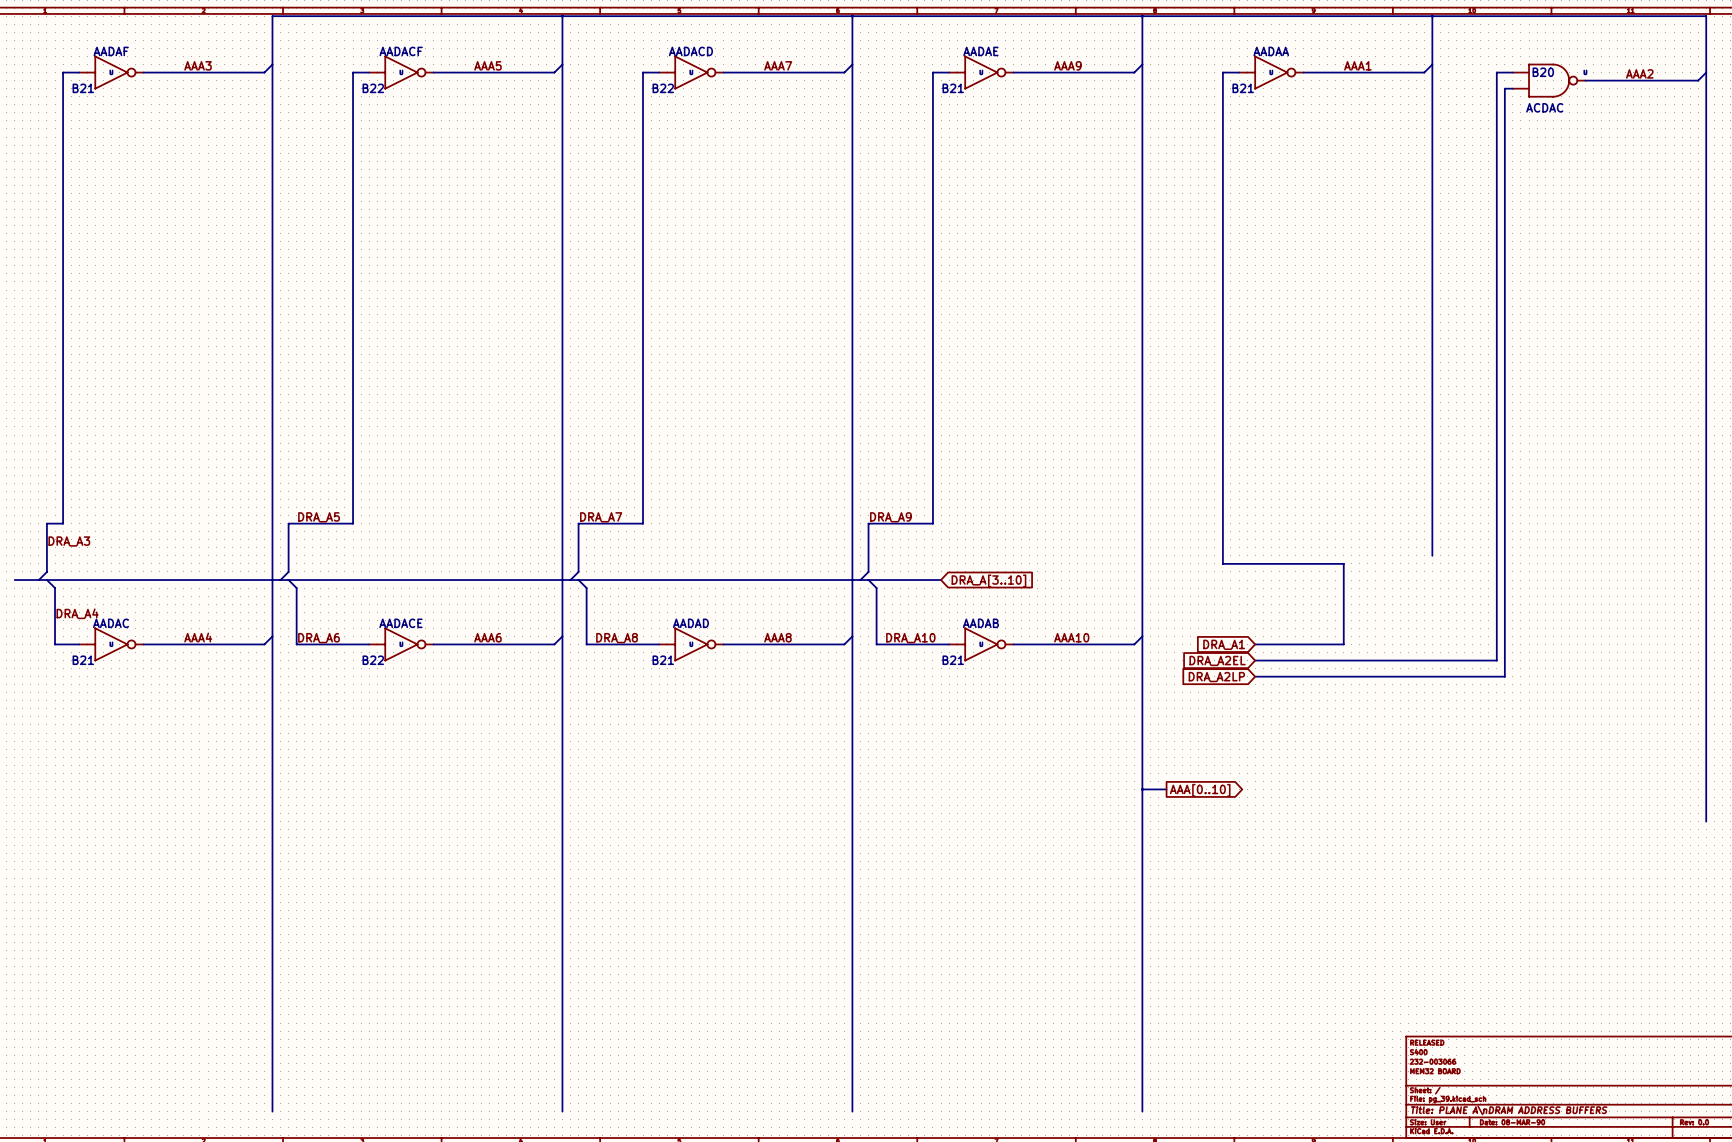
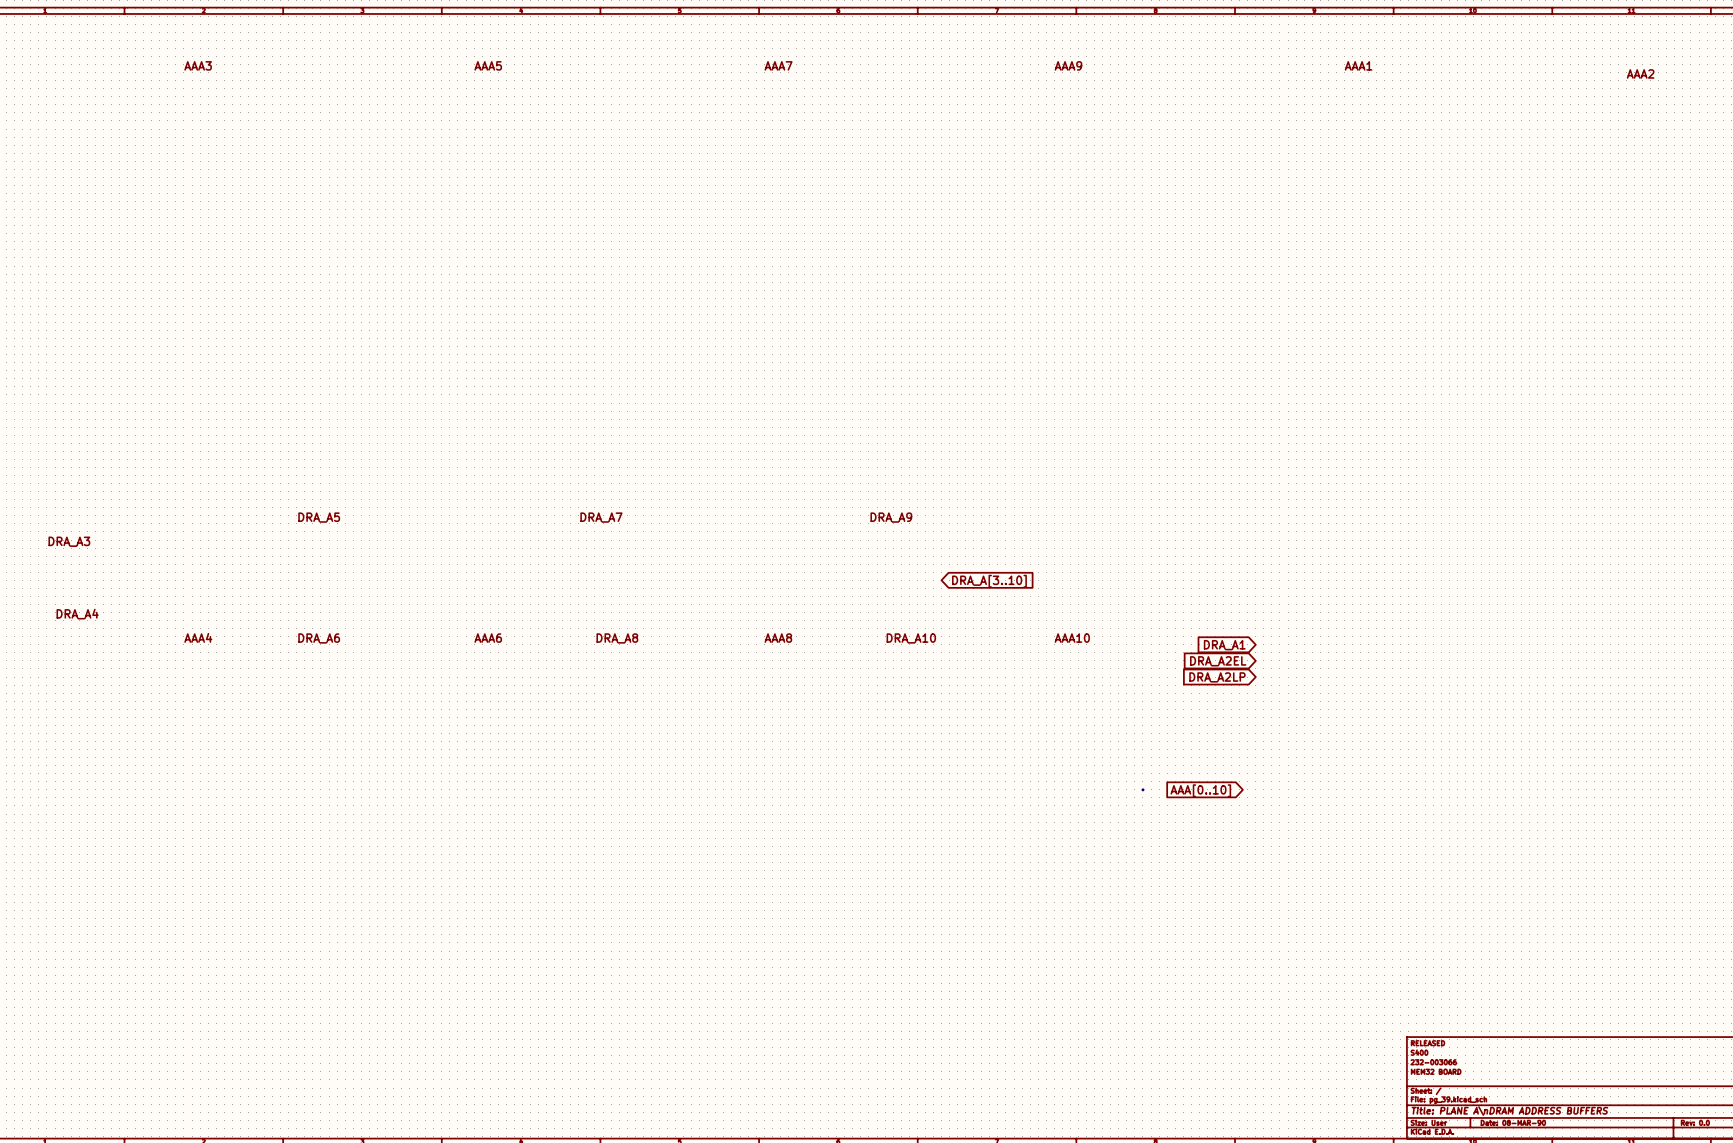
bus: (562, 16) (562, 1111) -> none
bus: (852, 16) (852, 1111) -> none
bus: (1142, 16) (1142, 1111) -> none
bus: (1432, 16) (1432, 555) -> none
wire: (272, 64) (264, 72) (143, 72) -> none
wire: (562, 64) (554, 72) (433, 72) -> none
wire: (852, 64) (844, 72) (723, 72) -> none
wire: (1142, 64) (1134, 72) (1013, 72) -> none
wire: (1432, 64) (1424, 72) (1303, 72) -> none
wire: (79, 72) (63, 72) (63, 523) (46, 523) (46, 571) (38, 580) -> none
part: (111, 72) -> none
wire: (369, 72) (353, 72) (353, 523) (288, 523) (288, 571) (280, 580) -> none
part: (401, 72) -> none
wire: (659, 72) (643, 72) (643, 523) (578, 523) (578, 571) (570, 580) -> none
part: (691, 72) -> none
wire: (949, 72) (932, 72) (932, 523) (868, 523) (868, 571) (860, 580) -> none
part: (981, 72) -> none
wire: (1239, 72) (1222, 72) (1222, 563) (1343, 563) (1343, 644) (1255, 644) -> none
part: (1271, 72) -> none
wire: (1512, 72) (1496, 72) (1496, 660) (1255, 660) -> none
wire: (1706, 72) (1698, 80) (1585, 80) -> none
part: (1549, 80) -> none
wire: (1512, 88) (1504, 88) (1504, 676) (1255, 676) -> none
bus: (14, 580) (941, 580) -> none
wire: (46, 580) (55, 588) (55, 644) (79, 644) -> none
wire: (288, 580) (296, 588) (296, 644) (369, 644) -> none
wire: (578, 580) (586, 588) (586, 644) (659, 644) -> none
wire: (868, 580) (876, 588) (876, 644) (949, 644) -> none
wire: (272, 636) (264, 644) (143, 644) -> none
wire: (562, 636) (554, 644) (433, 644) -> none
wire: (852, 636) (844, 644) (723, 644) -> none
wire: (1142, 636) (1134, 644) (1013, 644) -> none
part: (111, 644) -> none
part: (401, 644) -> none
part: (691, 644) -> none
part: (981, 644) -> none
bus: (1142, 789) (1166, 789) -> none
bus: (1706, 821) (1706, 16) (272, 16) (272, 1111) -> none

